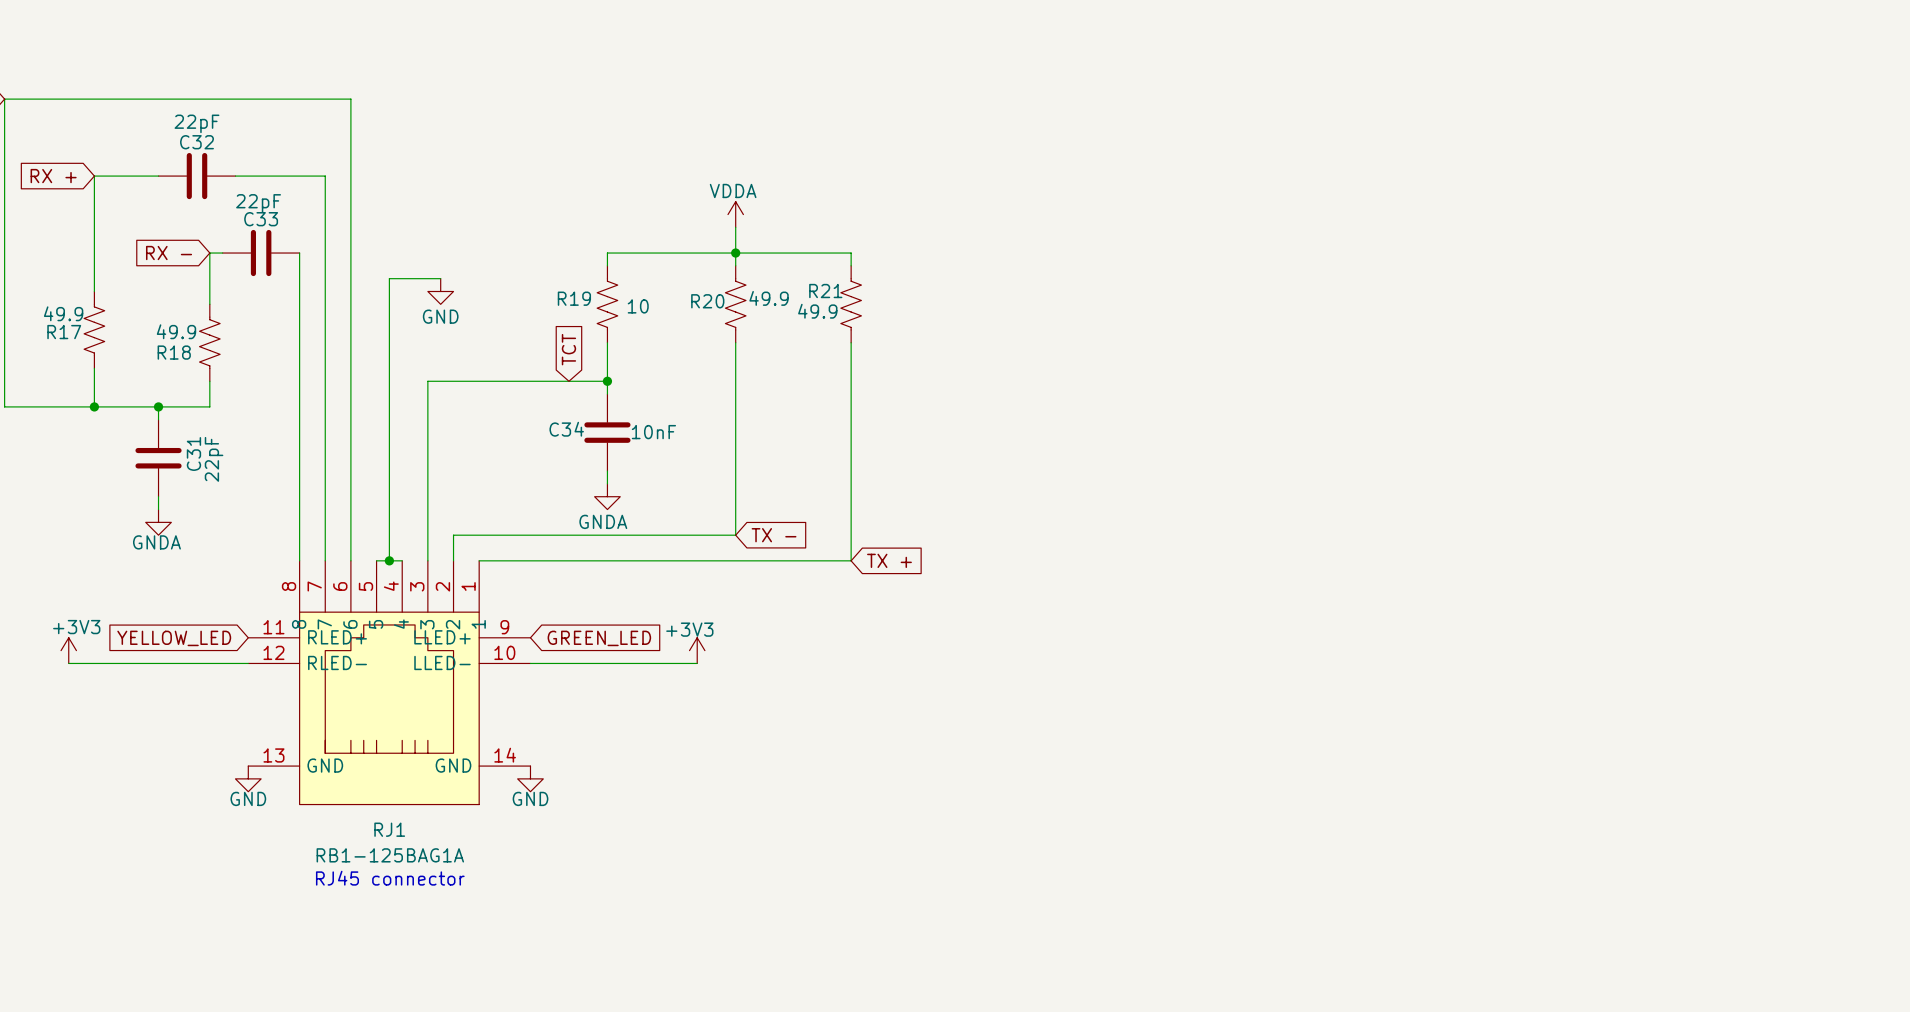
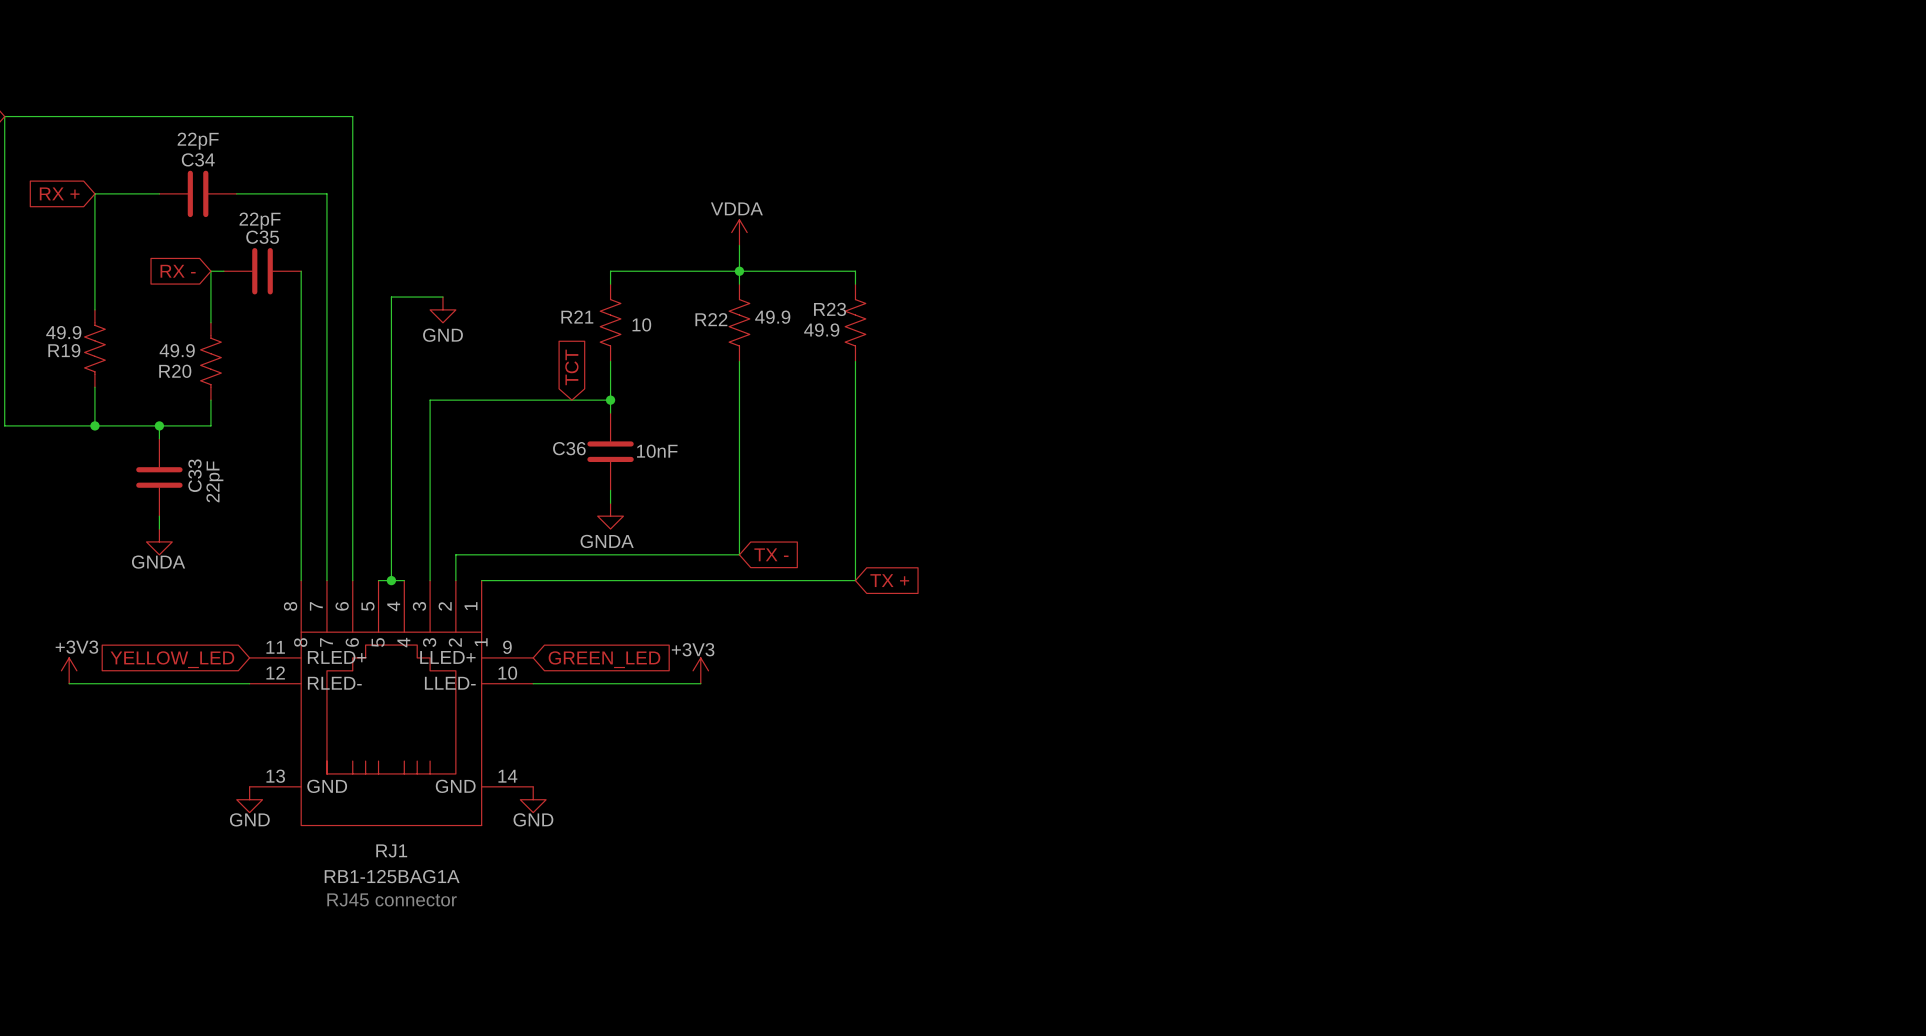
C32 name: C32 (197, 142) -> C34 (198, 159)
C33 name: C33 (261, 219) -> C35 (262, 237)
R21 name: R21 (825, 291) -> R23 (830, 309)
R19 name: R19 (574, 298) -> R21 (577, 317)
R20 name: R20 (707, 301) -> R22 (711, 319)
R17 name: R17 (64, 332) -> R19 (64, 350)
R18 name: R18 (174, 352) -> R20 (175, 371)
C34 name: C34 (566, 429) -> C36 (569, 448)
C31 name: C31 (193, 453) -> C33 (195, 475)

